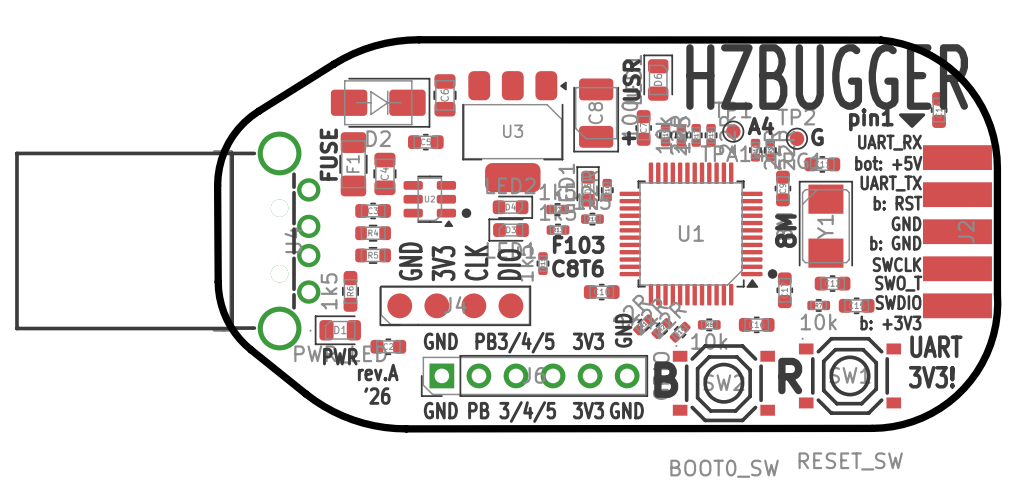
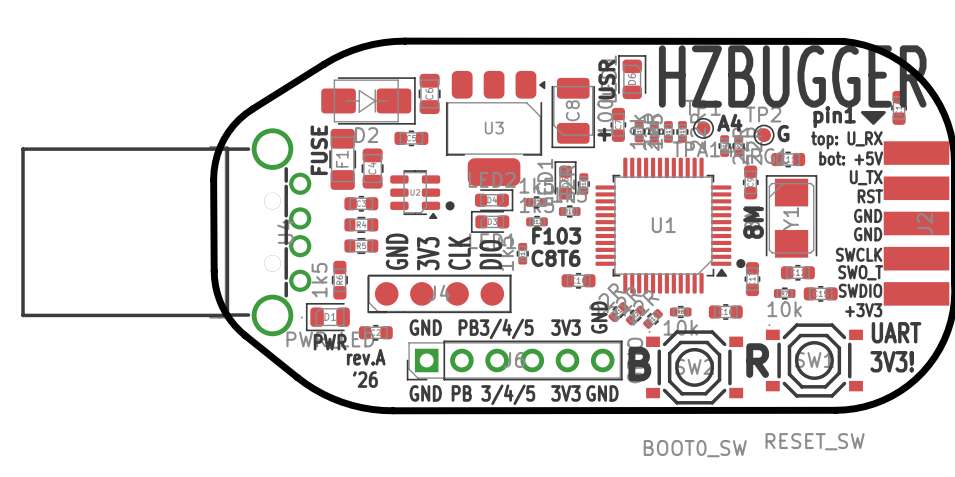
text: UART_RX (889, 142) -> top: U_RX (846, 140)
text: UART_TX (891, 183) -> U_TX (866, 177)
text: b: RST (898, 203) -> RST (870, 196)
text: b: GND (895, 243) -> GND (868, 234)
text: b: +3V3 (890, 323) -> +3V3 (863, 310)

